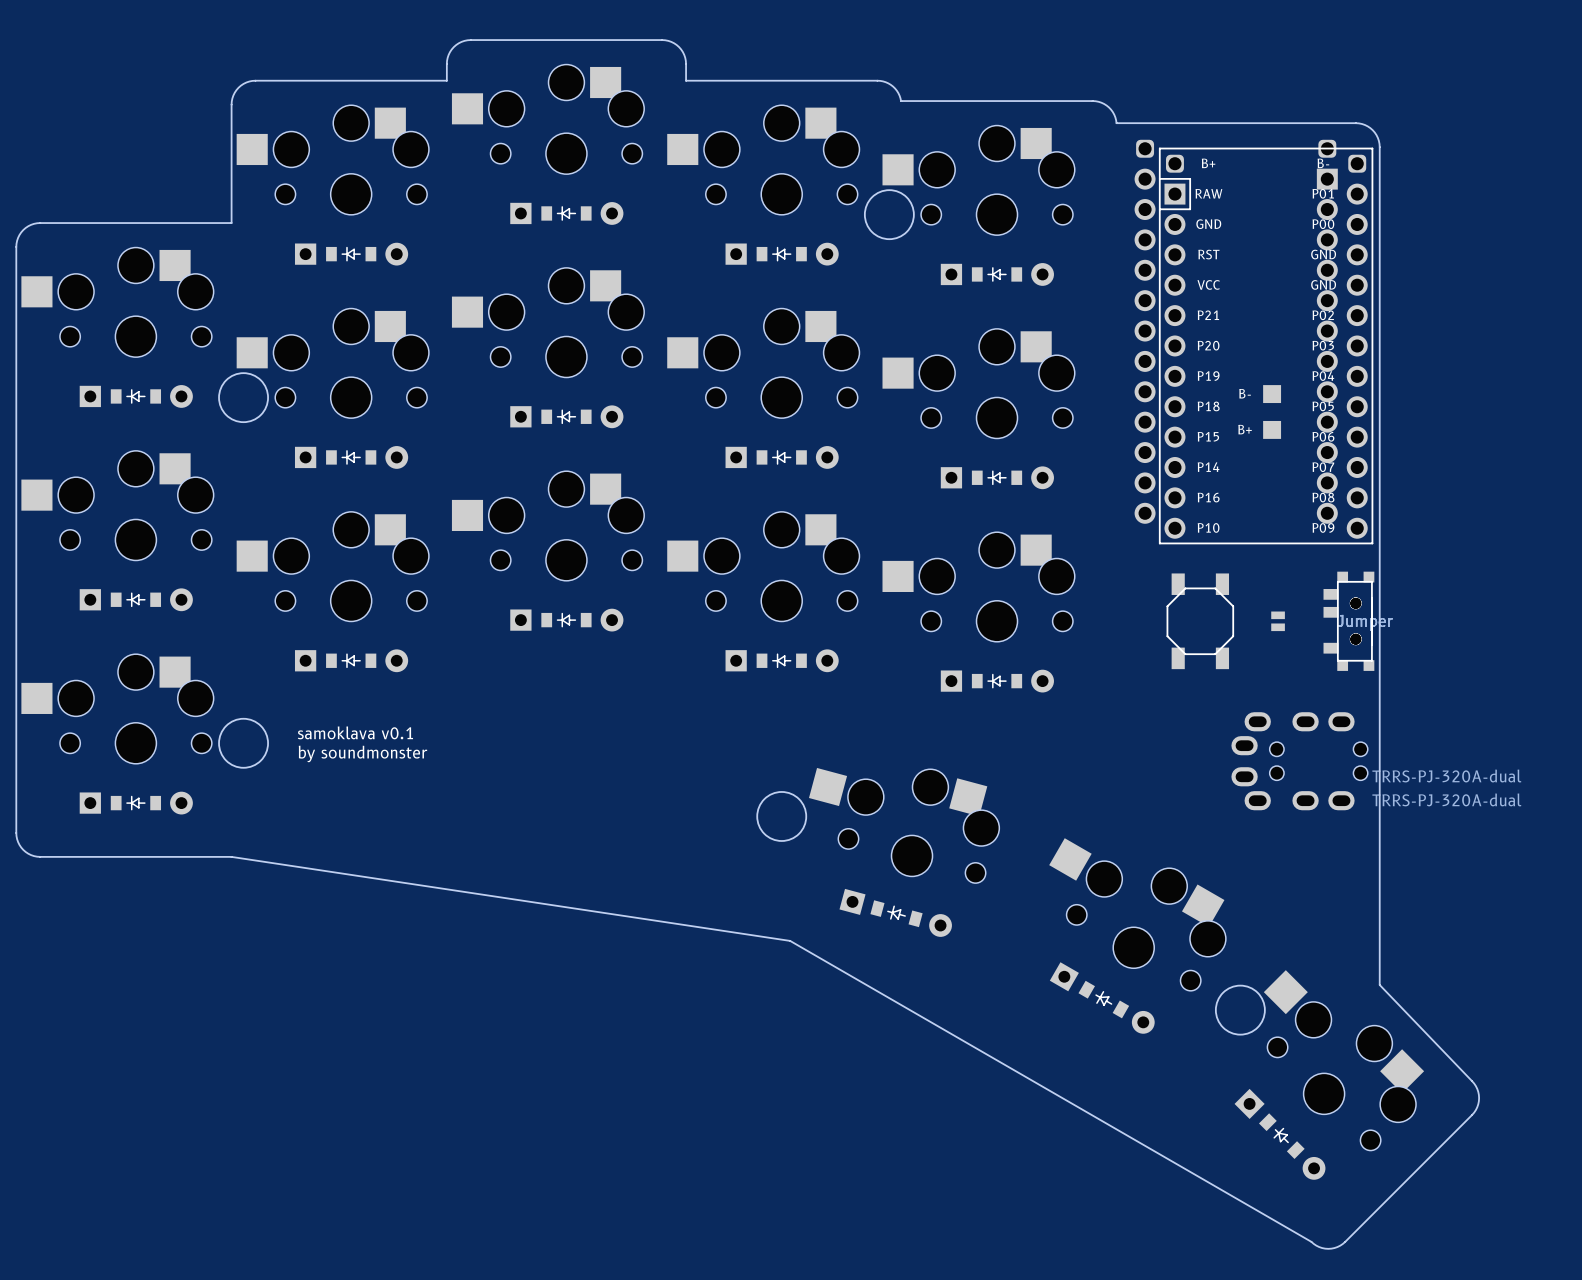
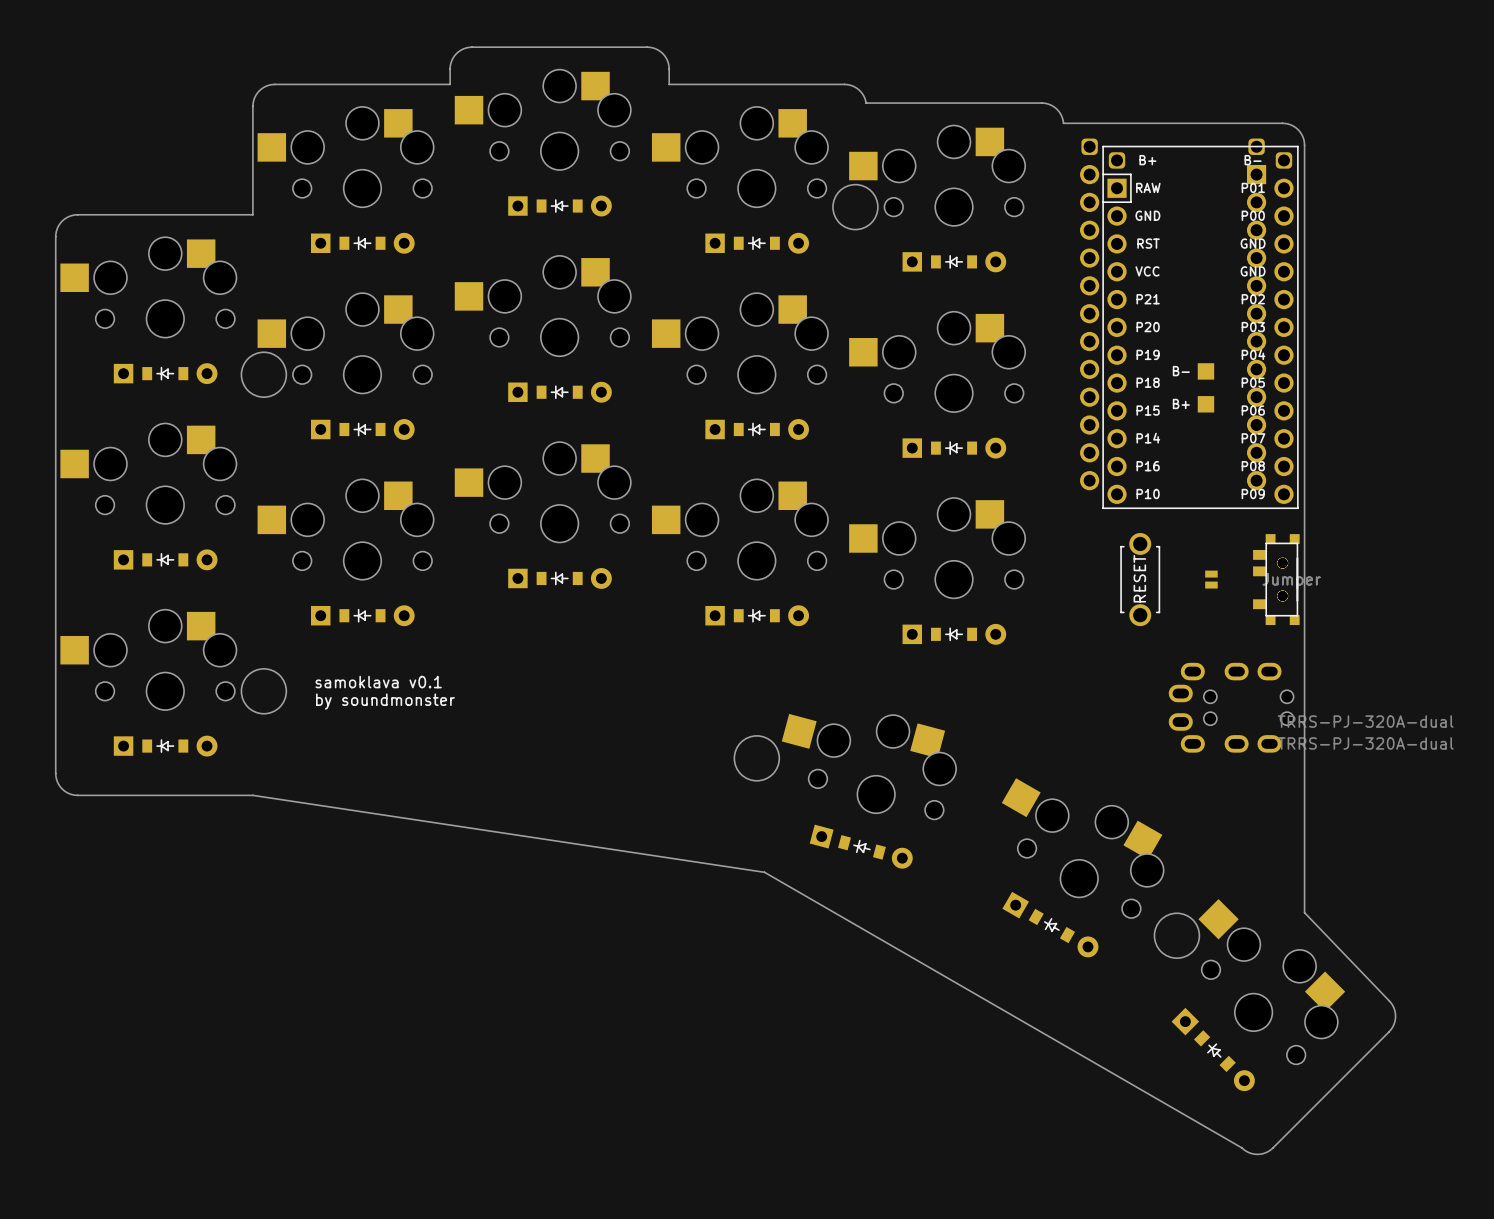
part footprint: [1166, 573, 1235, 670] -> [1120, 533, 1161, 627]

